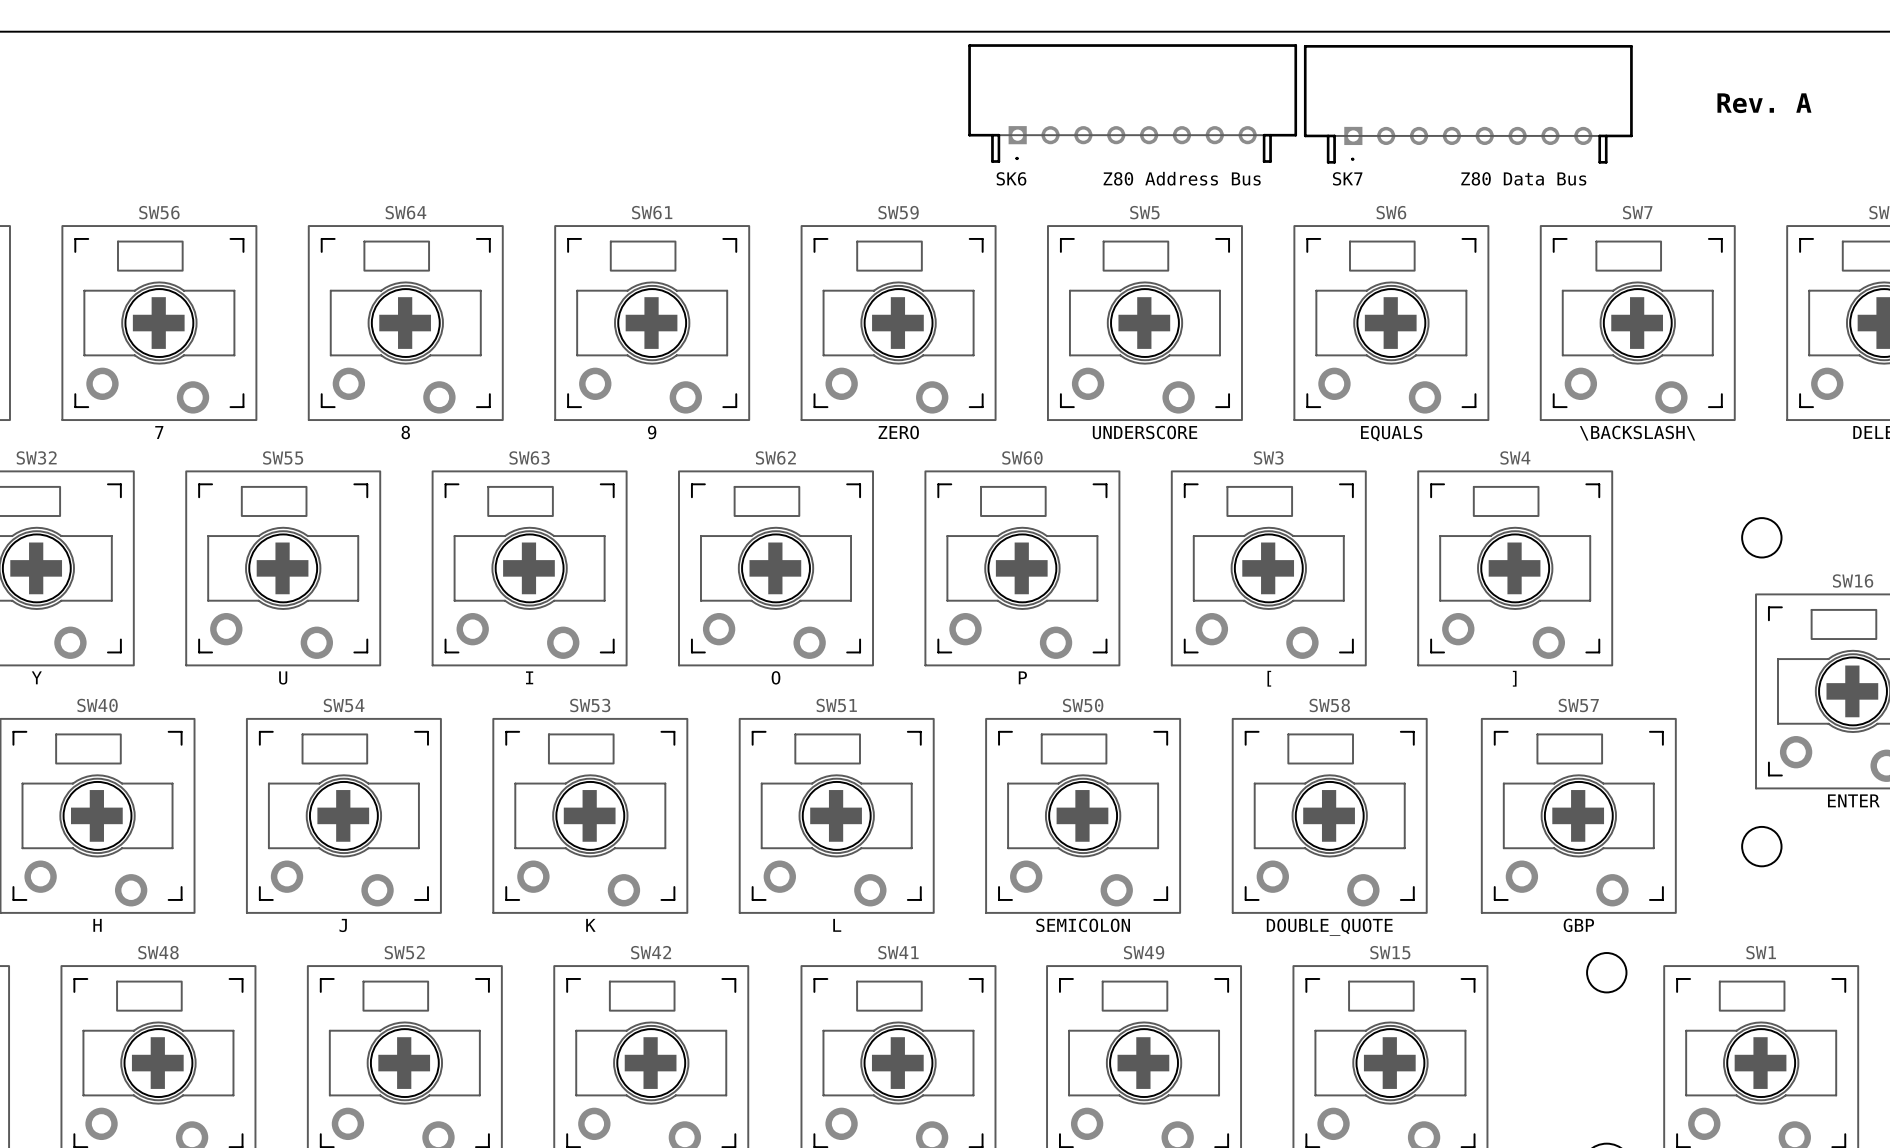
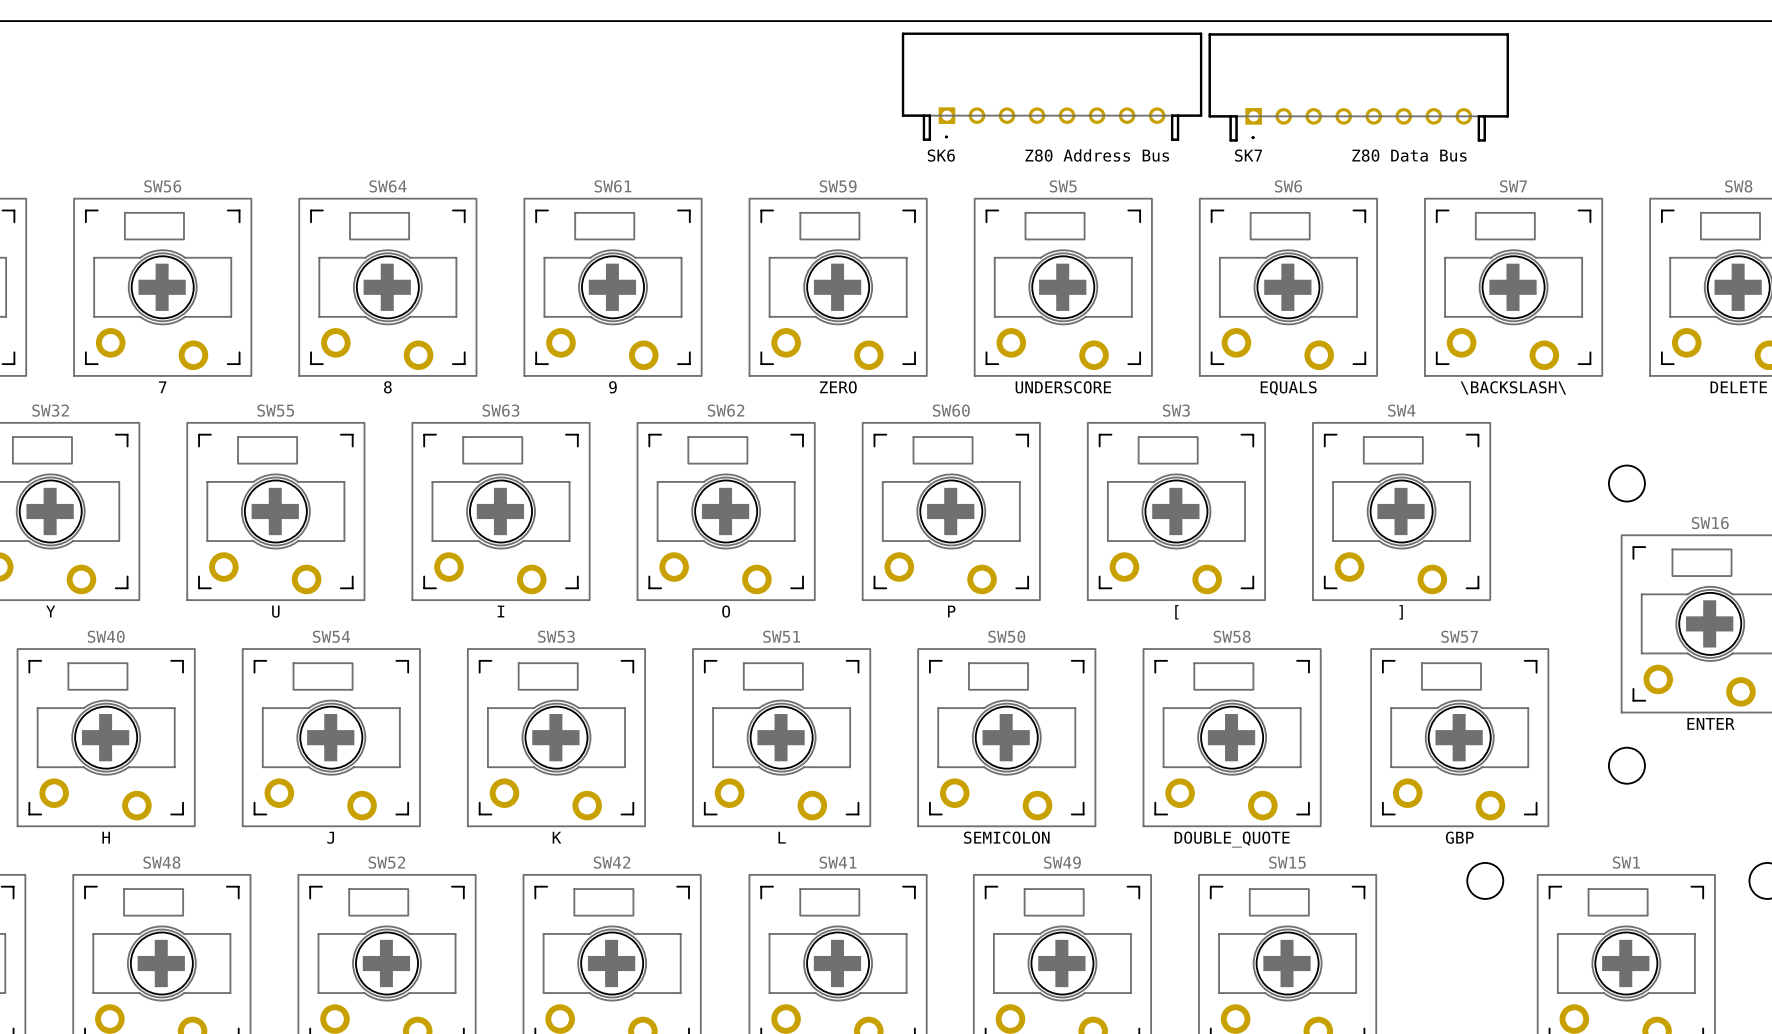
text: Rev. A (1764, 103) -> none

